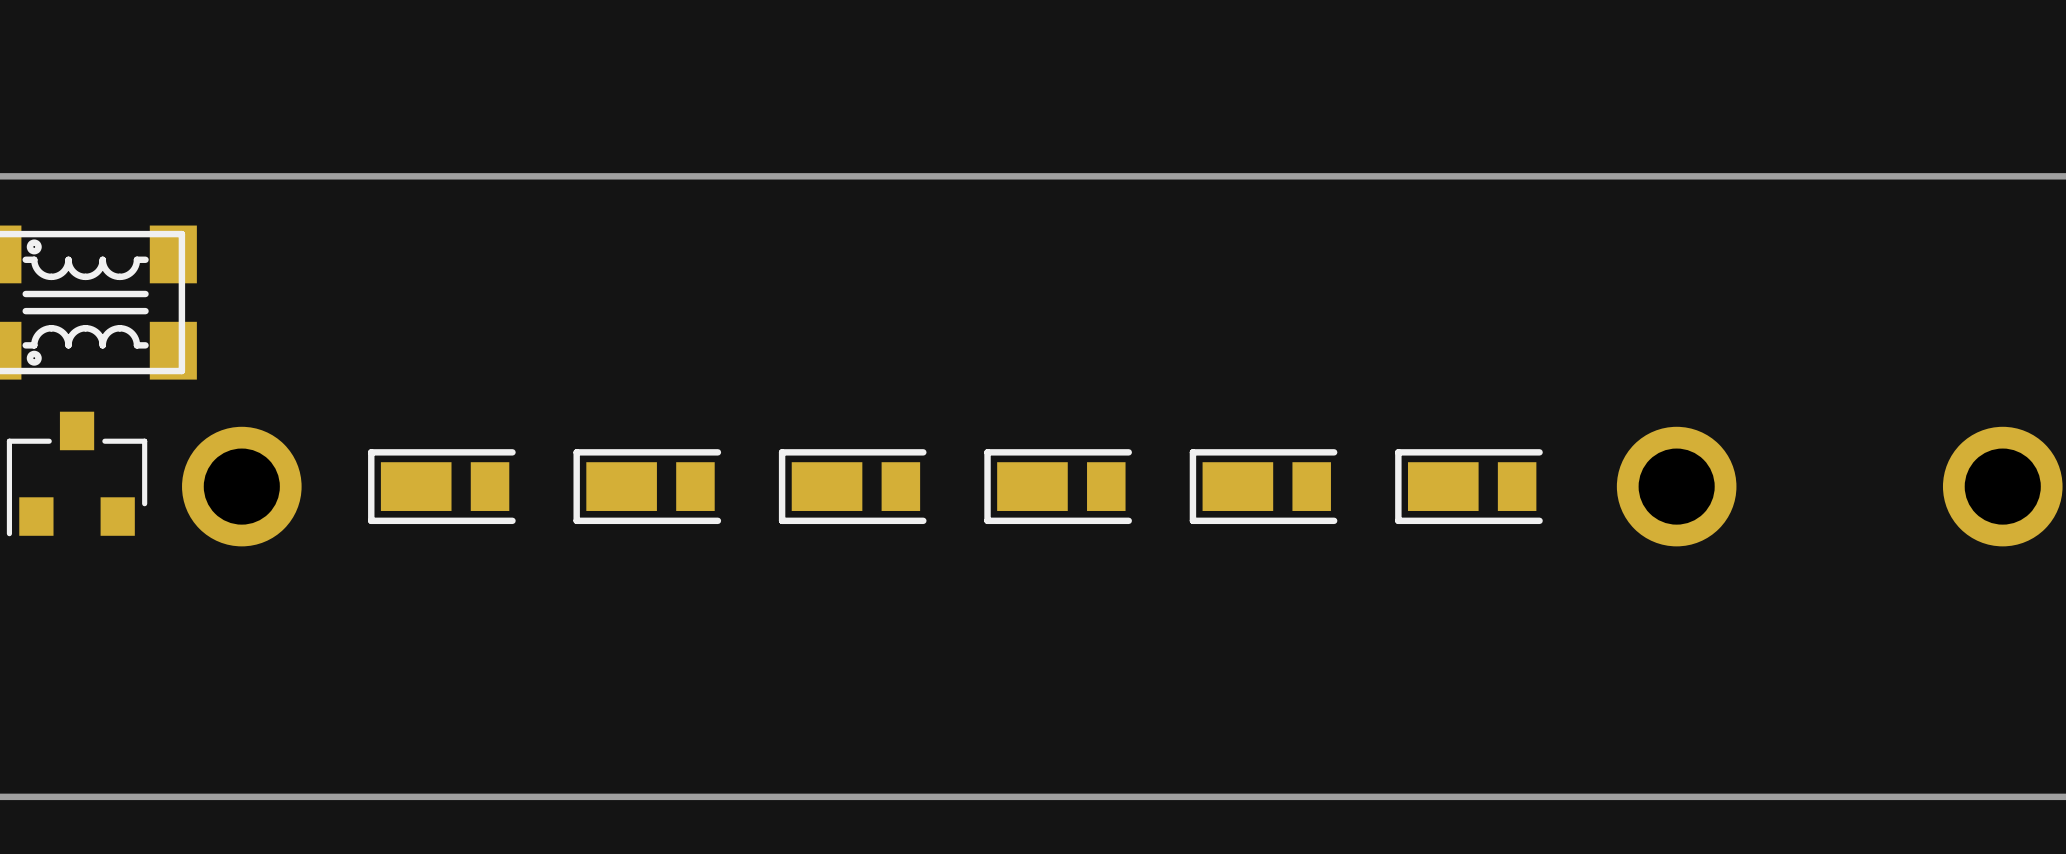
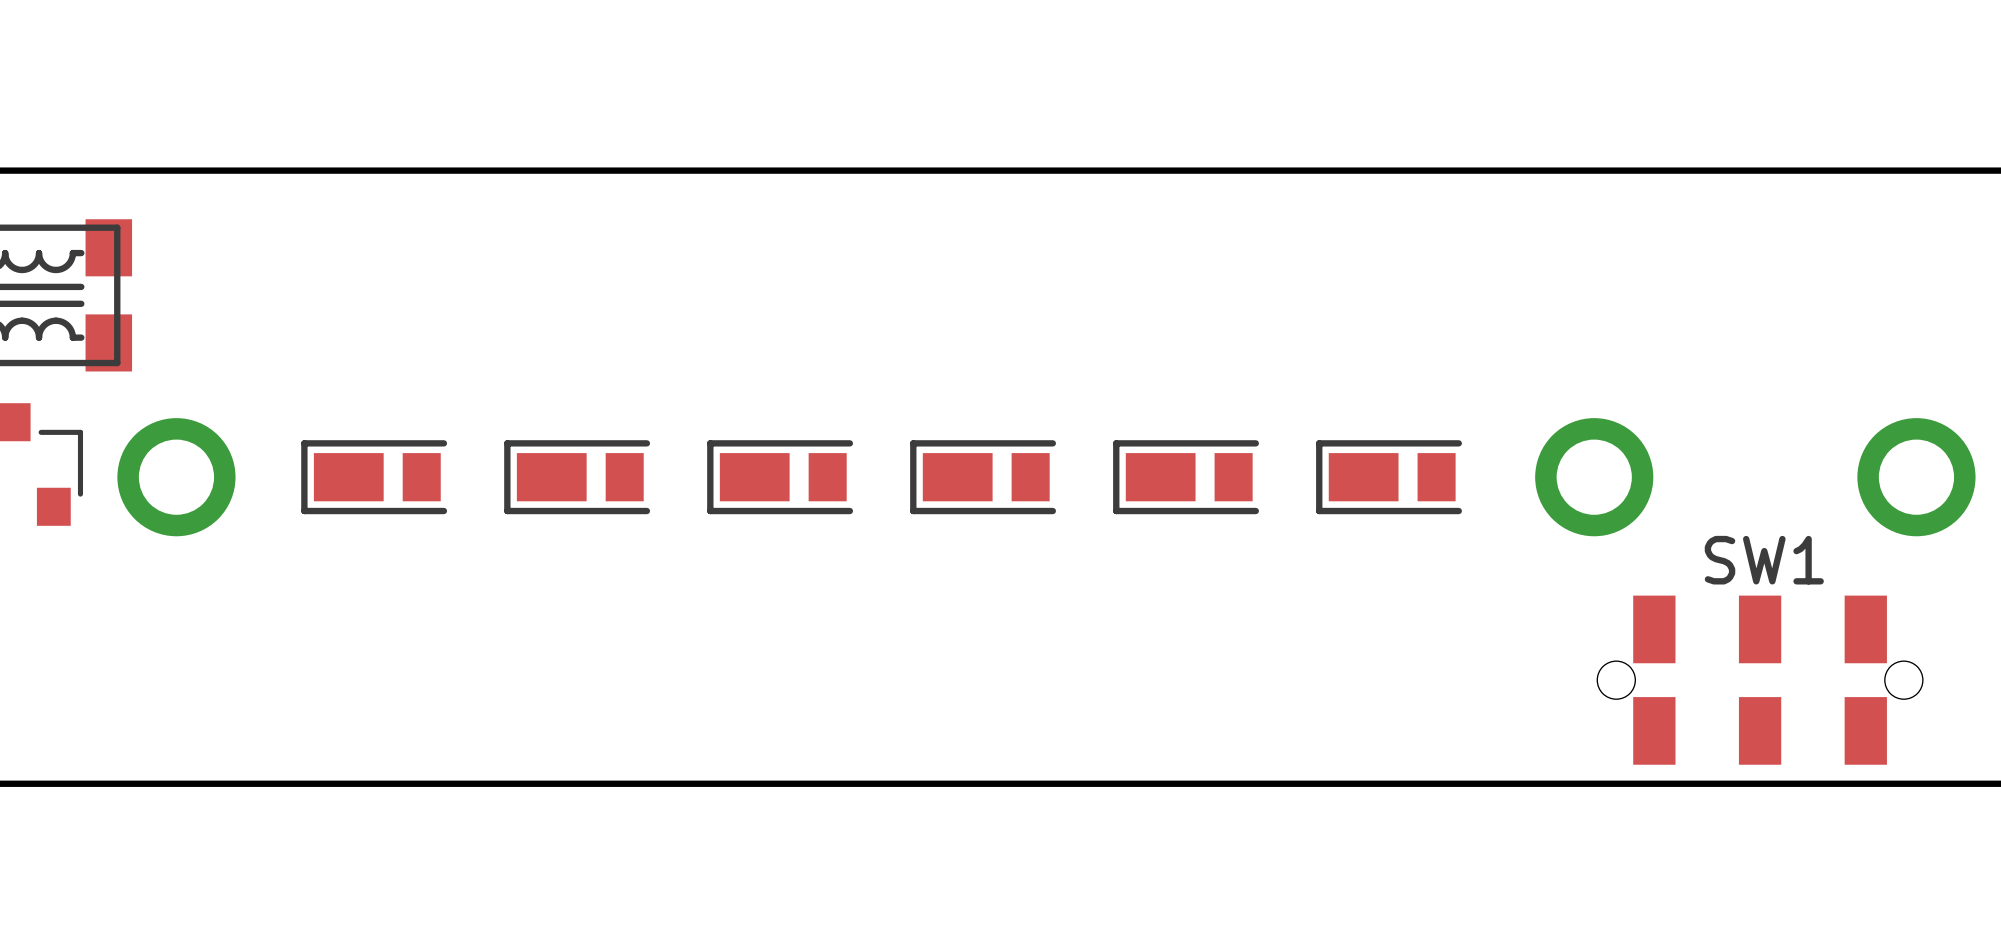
SW1: none -> (1760, 680)

